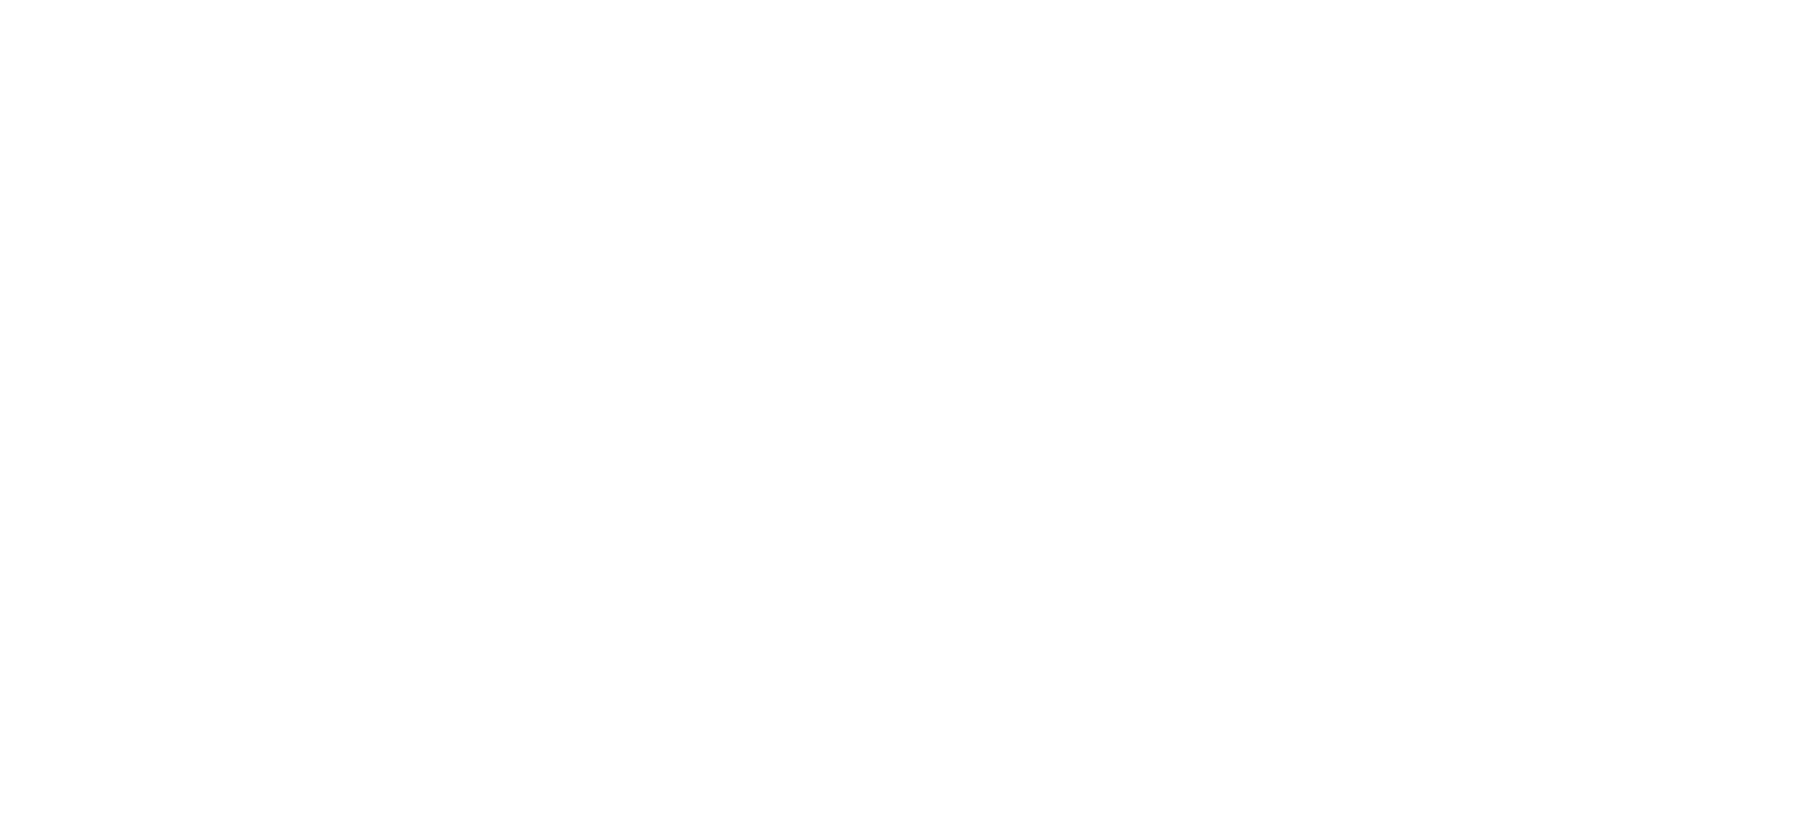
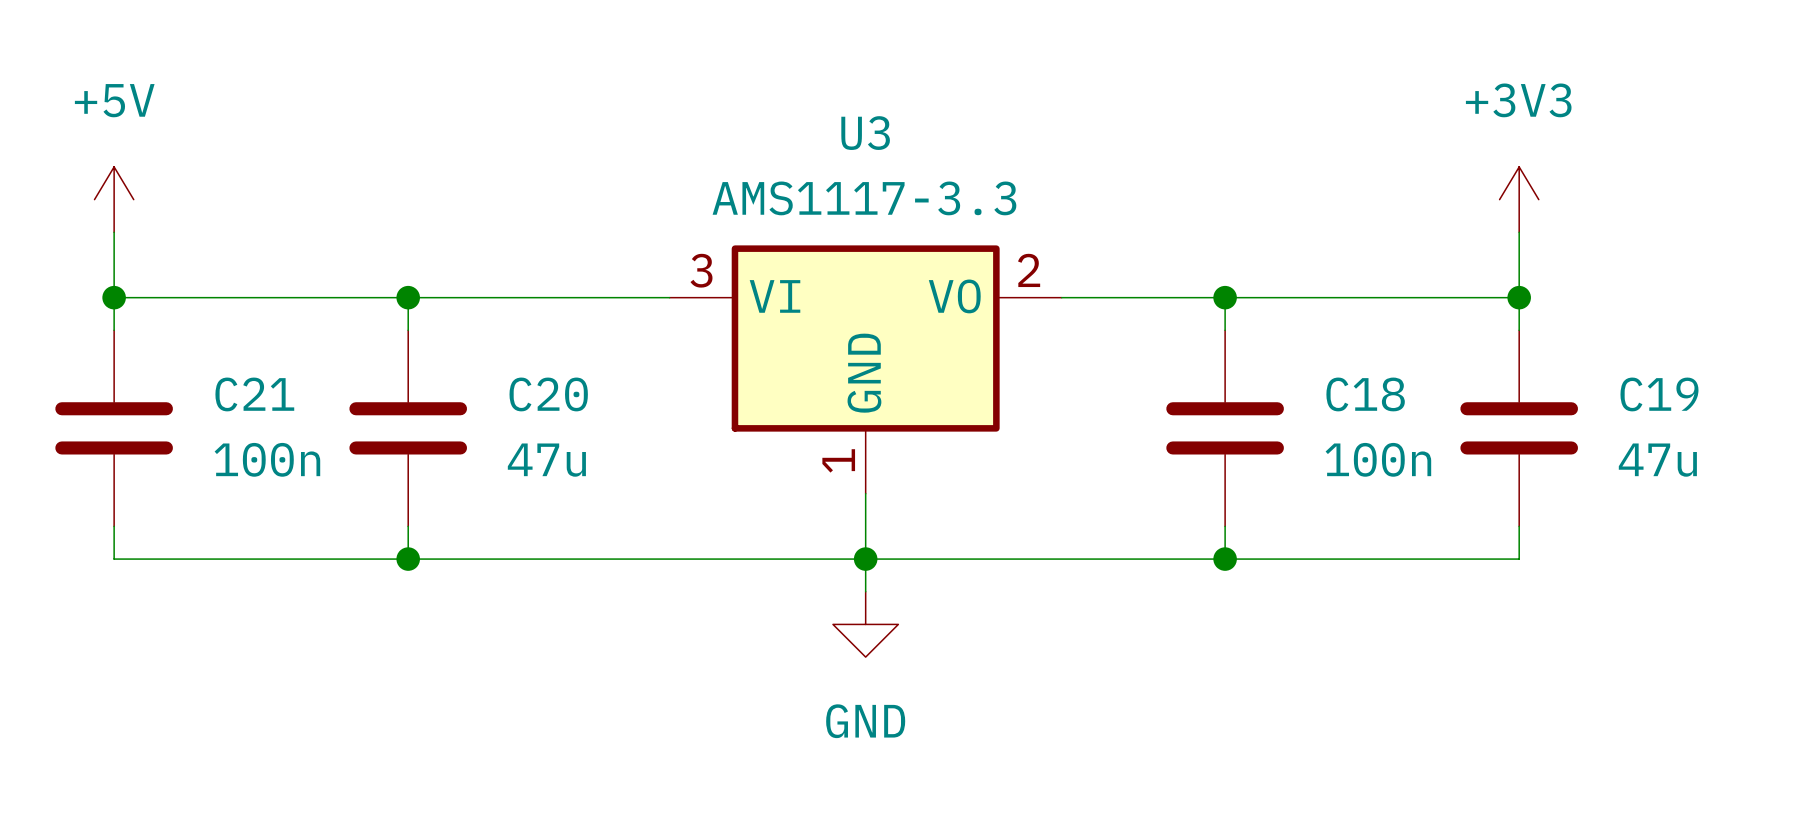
power symbol: none -> +5V (114, 199)
power symbol: none -> +3V3 (1519, 199)
wire: none -> (114, 232) (114, 330)
wire: none -> (1519, 232) (1519, 330)
wire: none -> (114, 297) (669, 297)
junction: none -> (114, 297)
wire: none -> (408, 297) (408, 330)
junction: none -> (408, 297)
wire: none -> (1061, 297) (1519, 297)
wire: none -> (1225, 297) (1225, 330)
junction: none -> (1225, 297)
junction: none -> (1519, 297)
U3: none -> AMS1117-3.3 (865, 369)
C21: none -> 100n (114, 428)
C20: none -> 47u (408, 428)
C18: none -> 100n (1225, 428)
C19: none -> 47u (1519, 428)
wire: none -> (865, 493) (865, 591)
wire: none -> (114, 526) (114, 559) (1519, 559) (1519, 526)
wire: none -> (408, 526) (408, 559)
wire: none -> (1225, 526) (1225, 559)
junction: none -> (408, 559)
junction: none -> (865, 559)
junction: none -> (1225, 559)
power symbol: none -> GND (865, 624)

